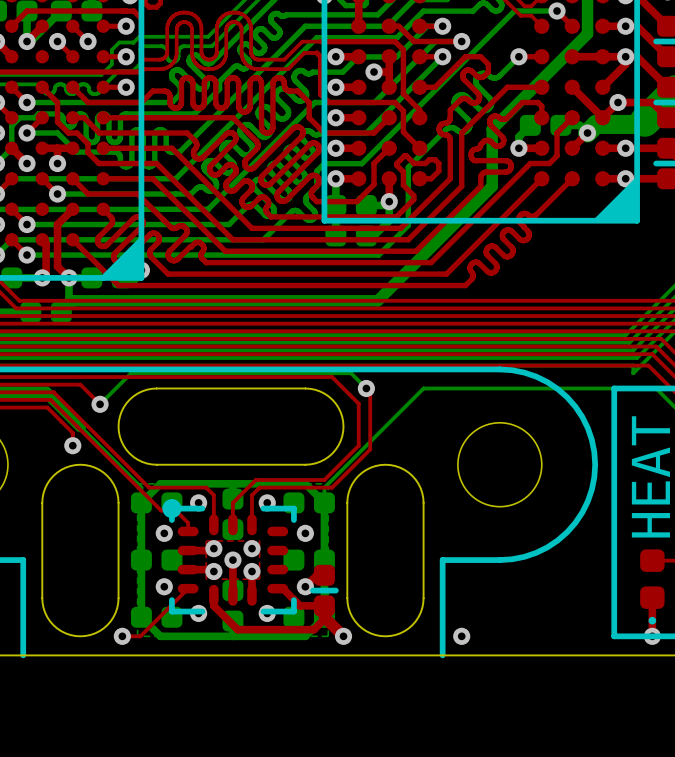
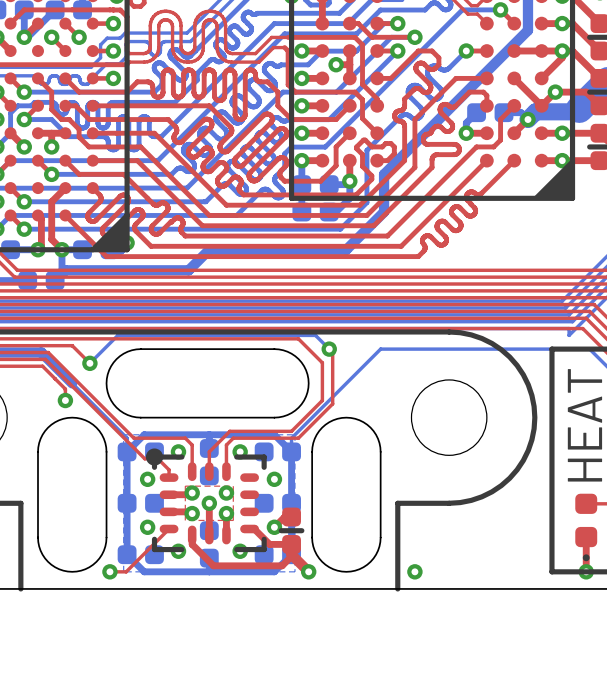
bottom track: (492, 129) (492, 186) (377, 300) (210, 300) -> (442, 116) (384, 174) (384, 212) (346, 249) (209, 249) (188, 270)

